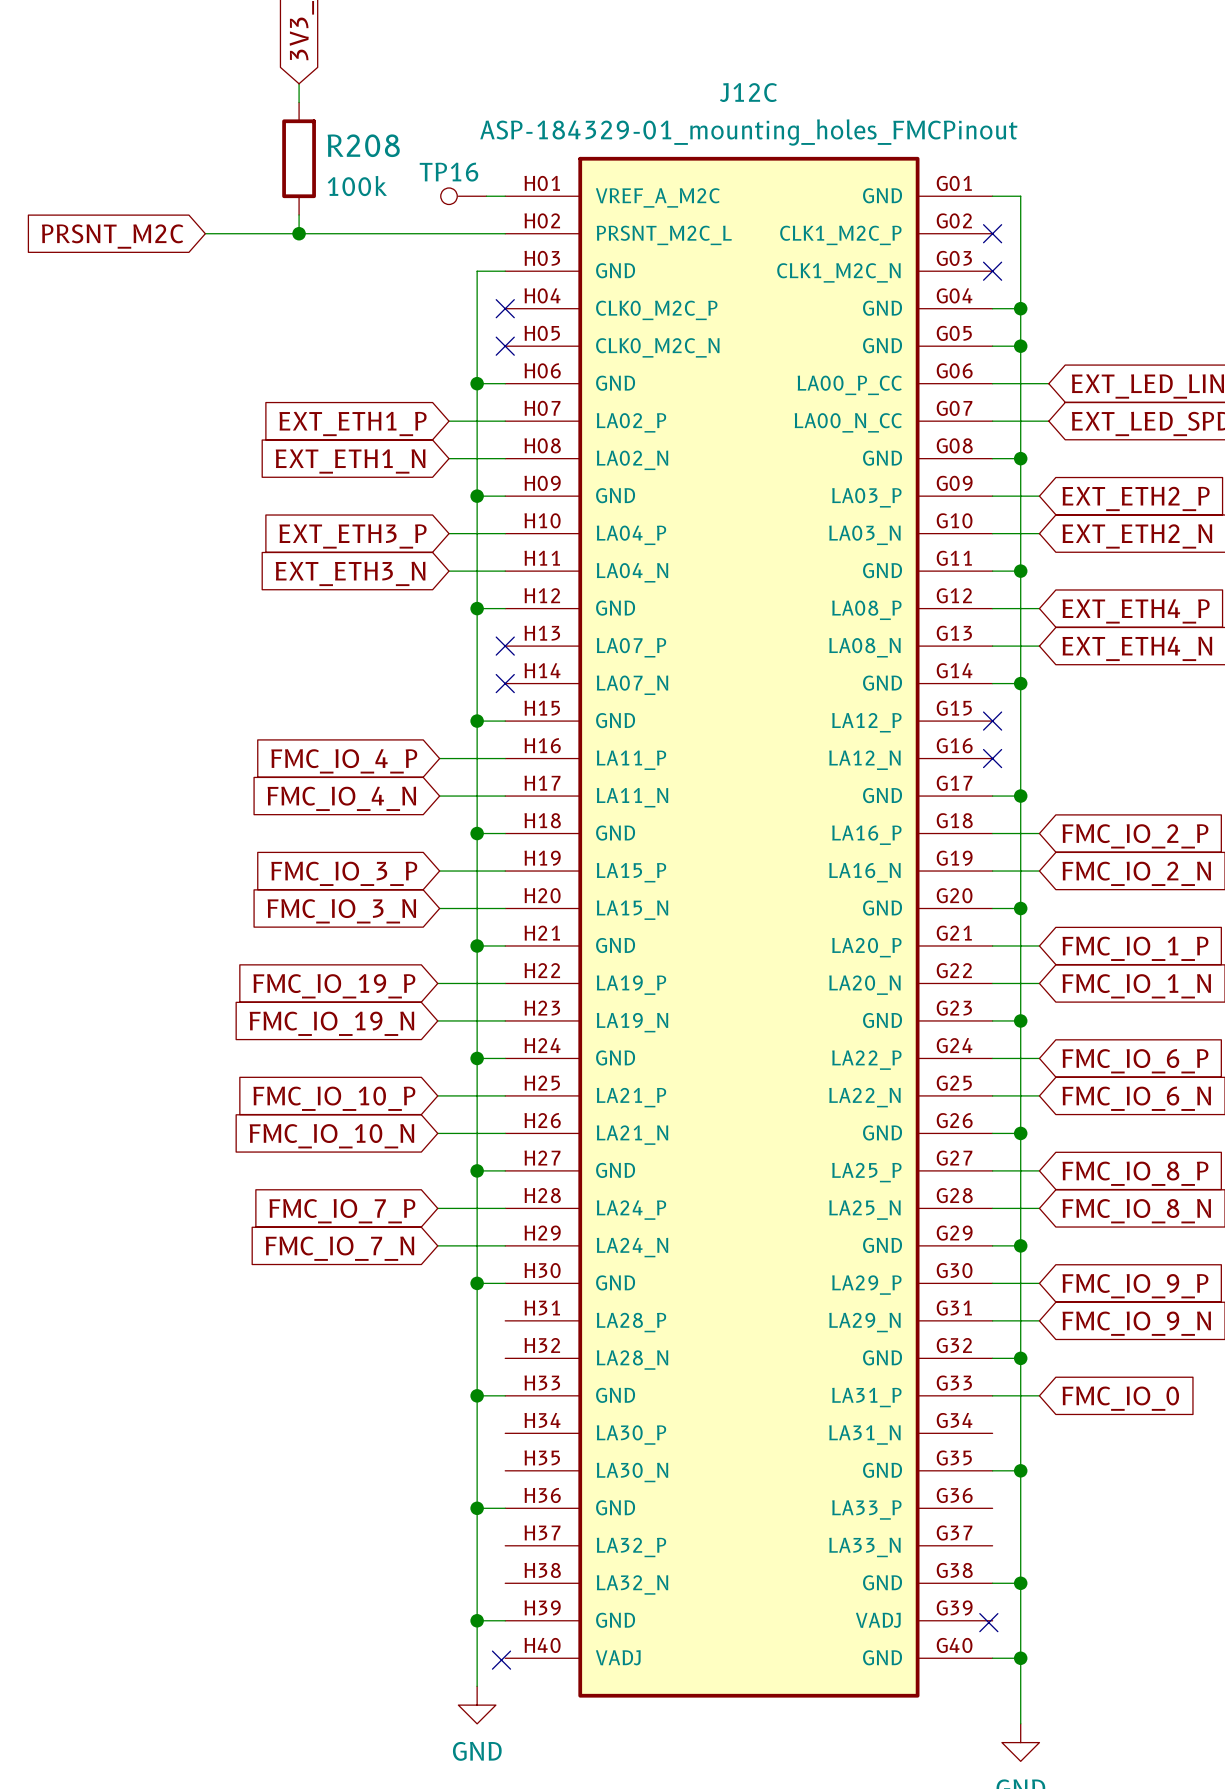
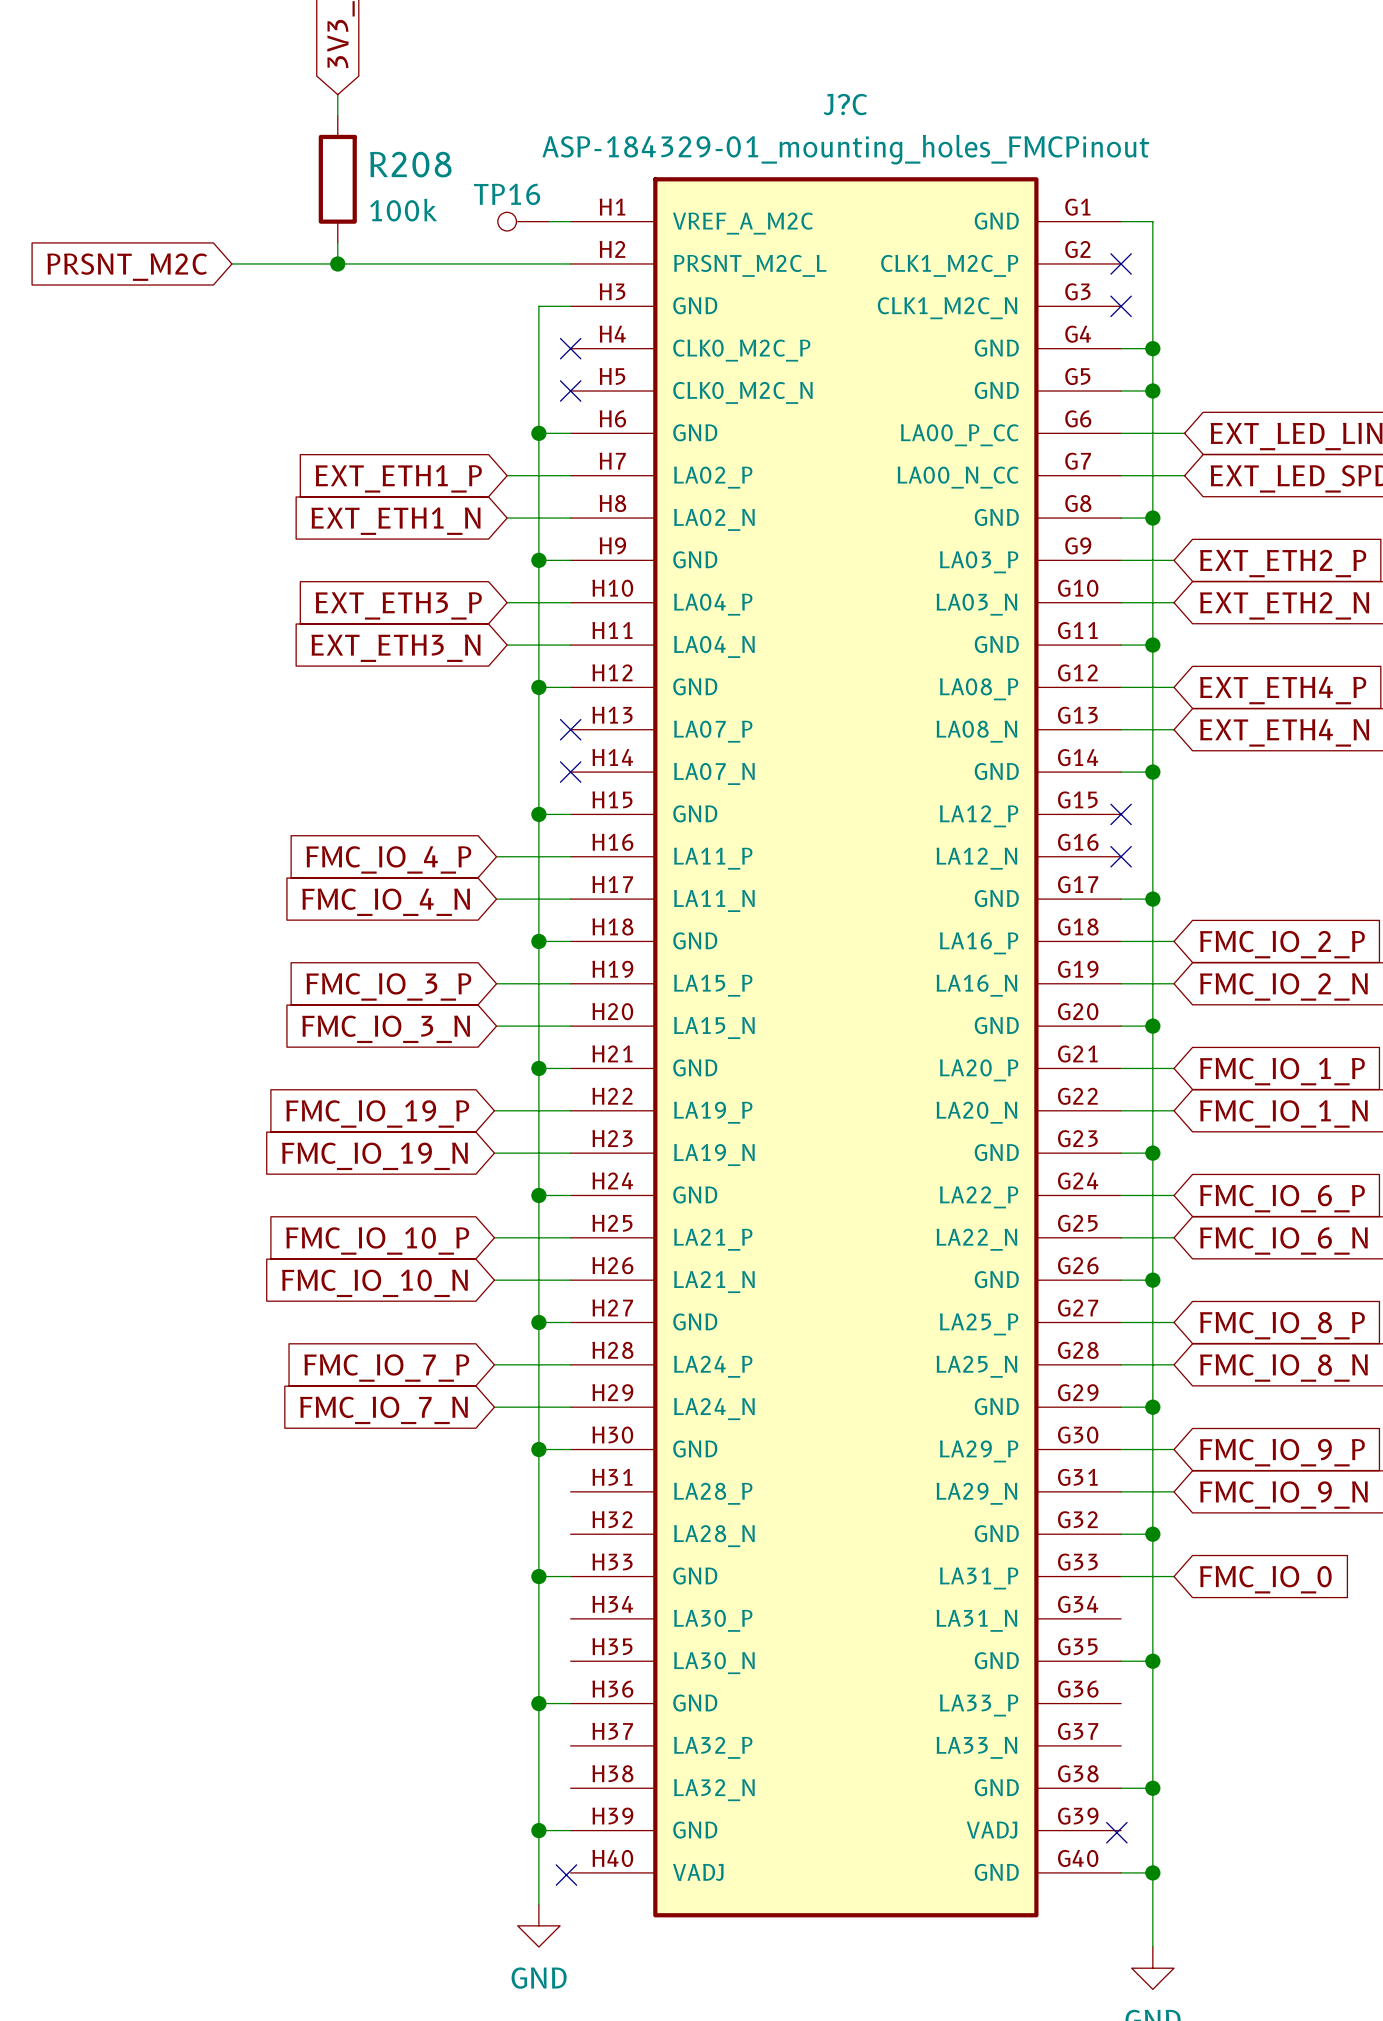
J12C name: J12C (748, 92) -> J?C (845, 104)
J12C symbol: [505, 156, 993, 1698] -> [570, 177, 1122, 1918]

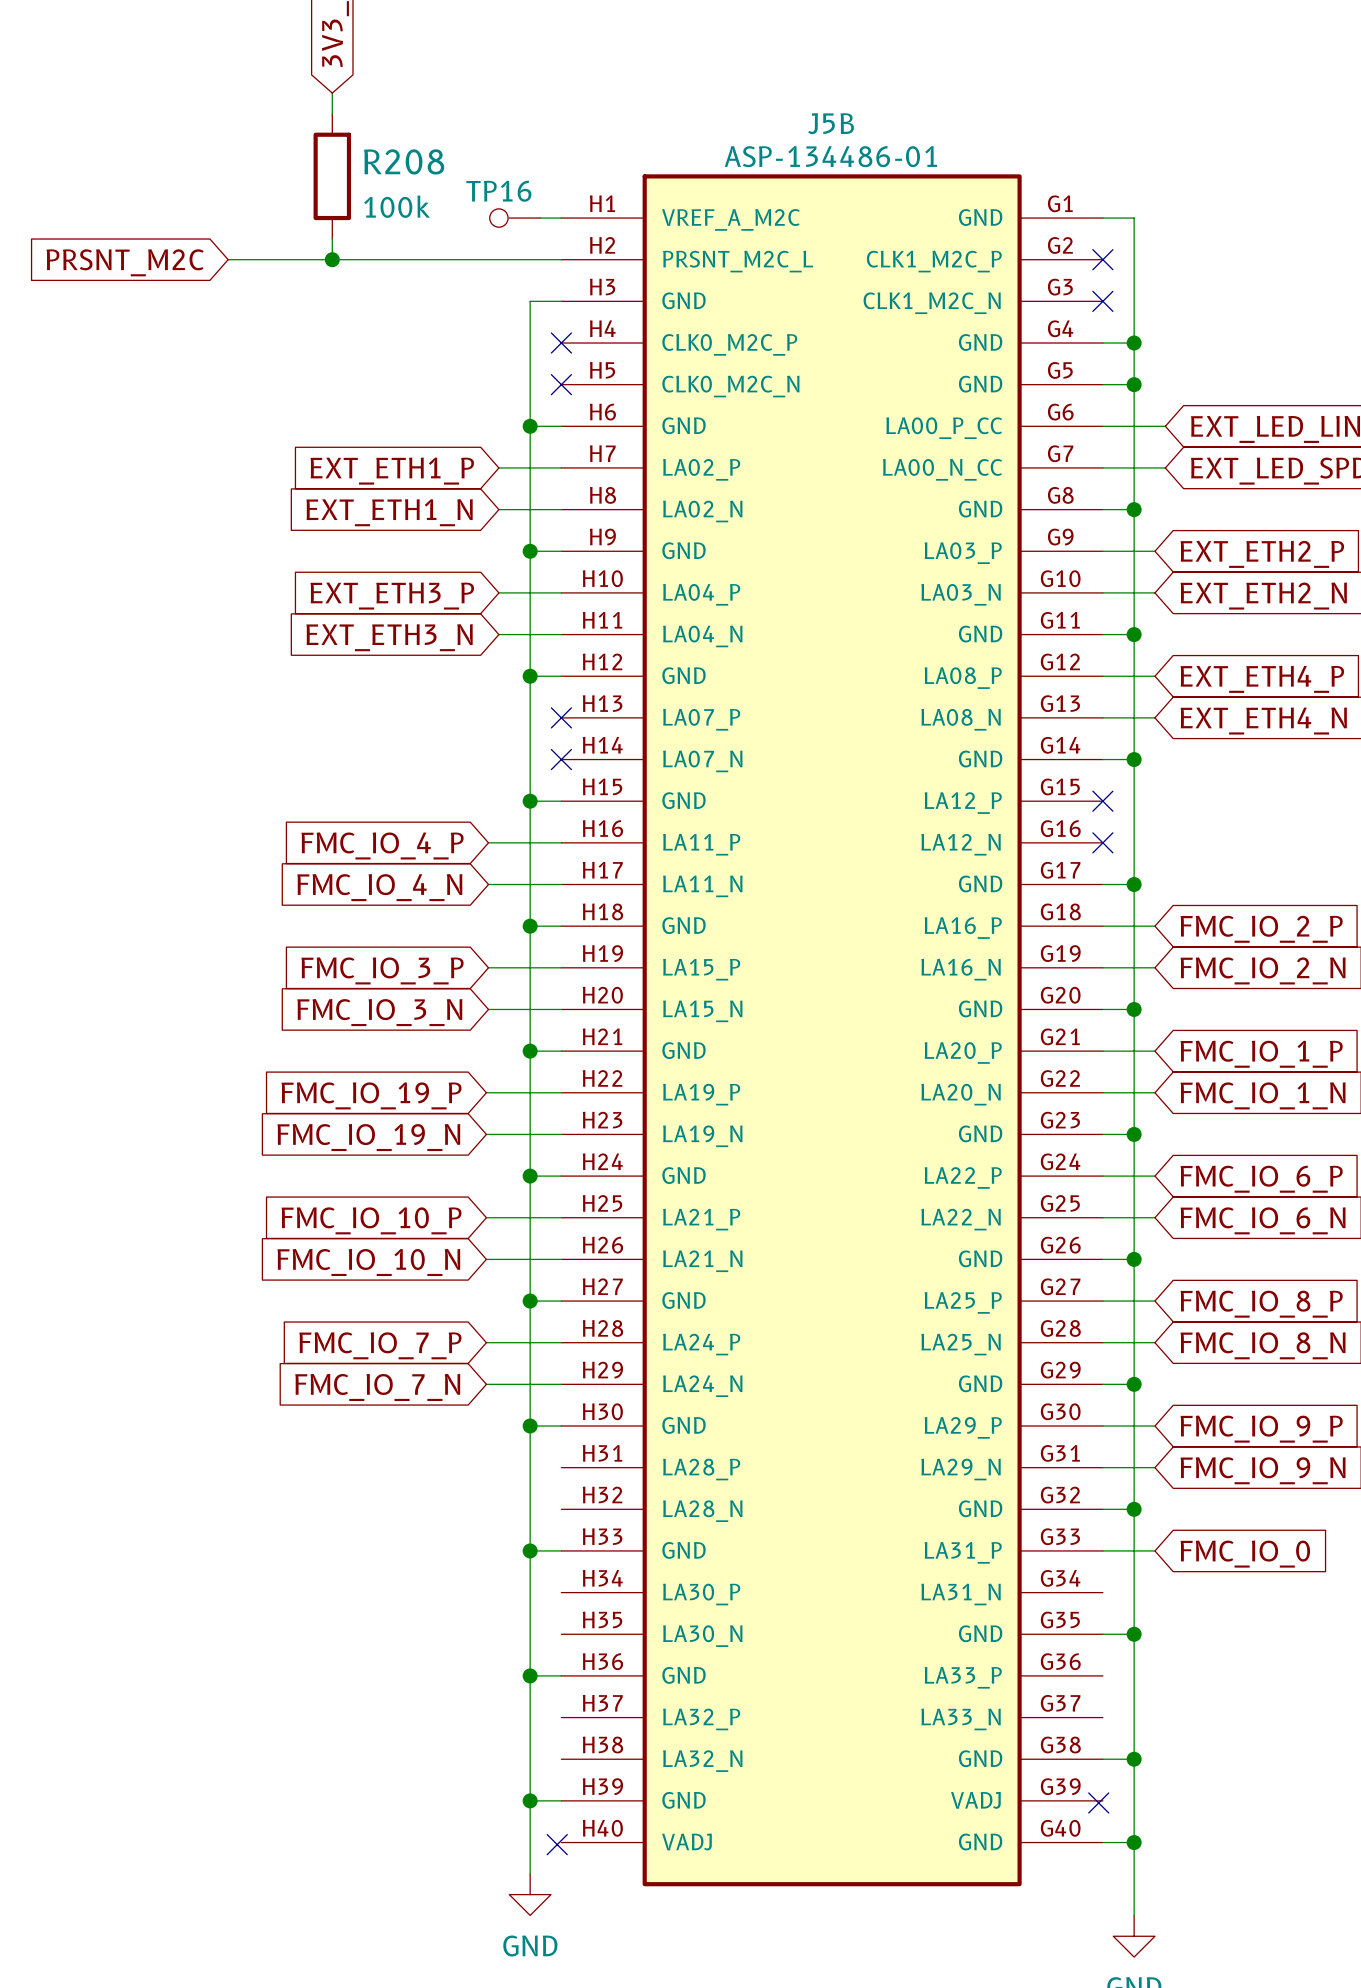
J?C name: J?C (845, 104) -> J5B (831, 123)
J?C value: ASP-184329-01_mounting_holes_FMCPinout (845, 149) -> ASP-134486-01 (830, 156)

